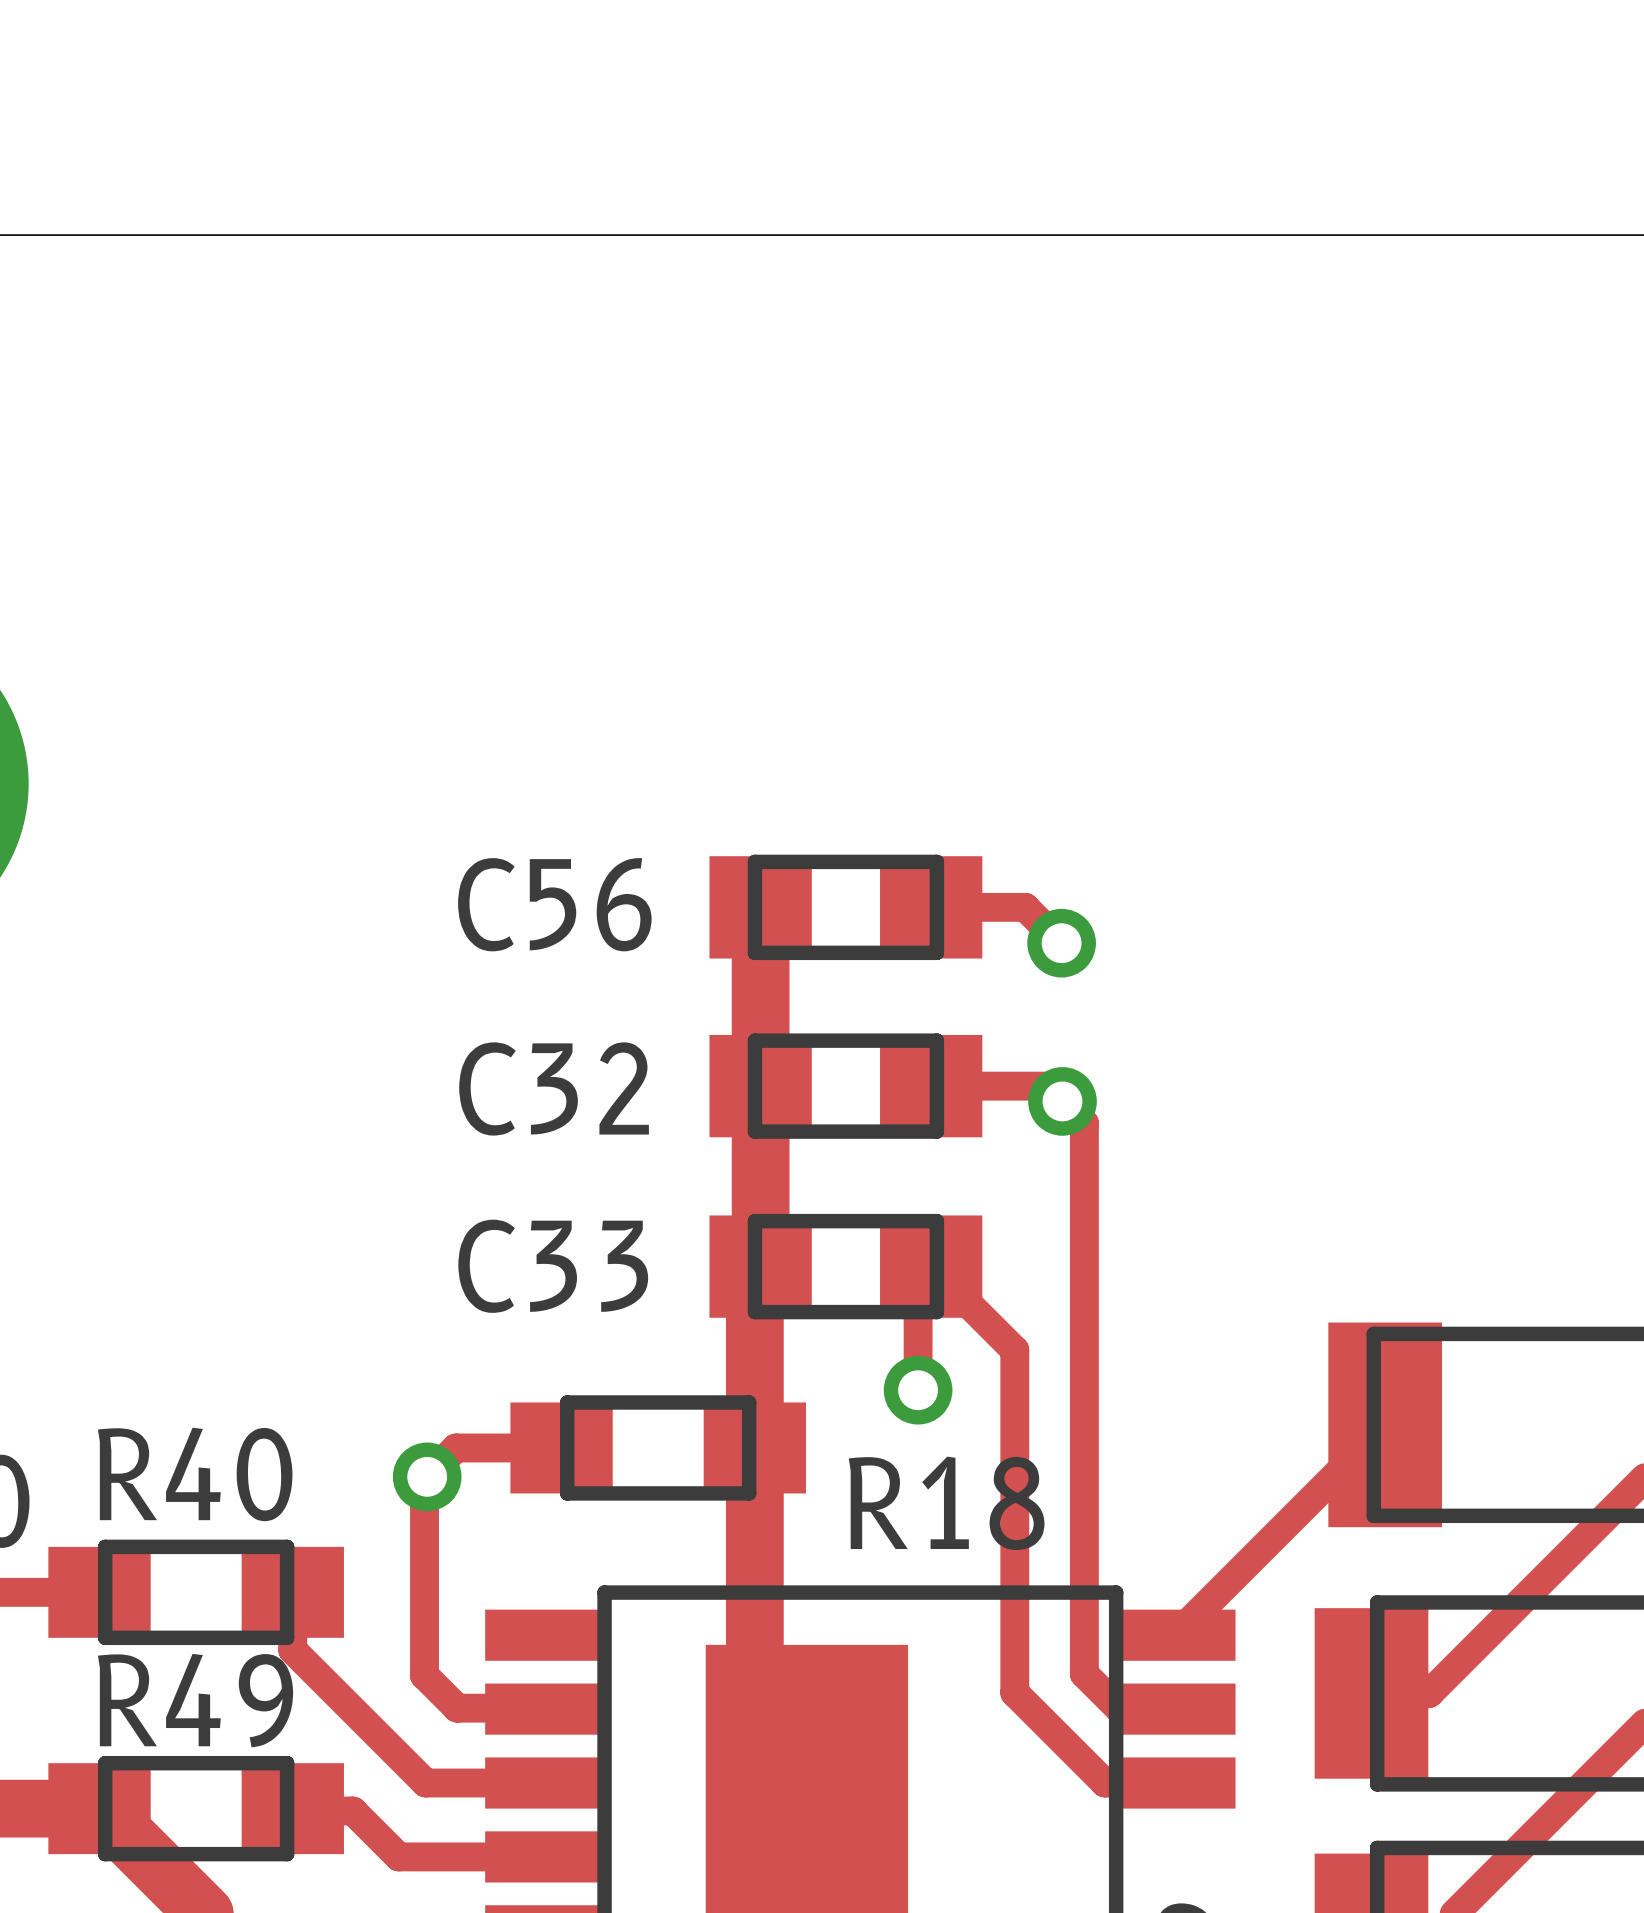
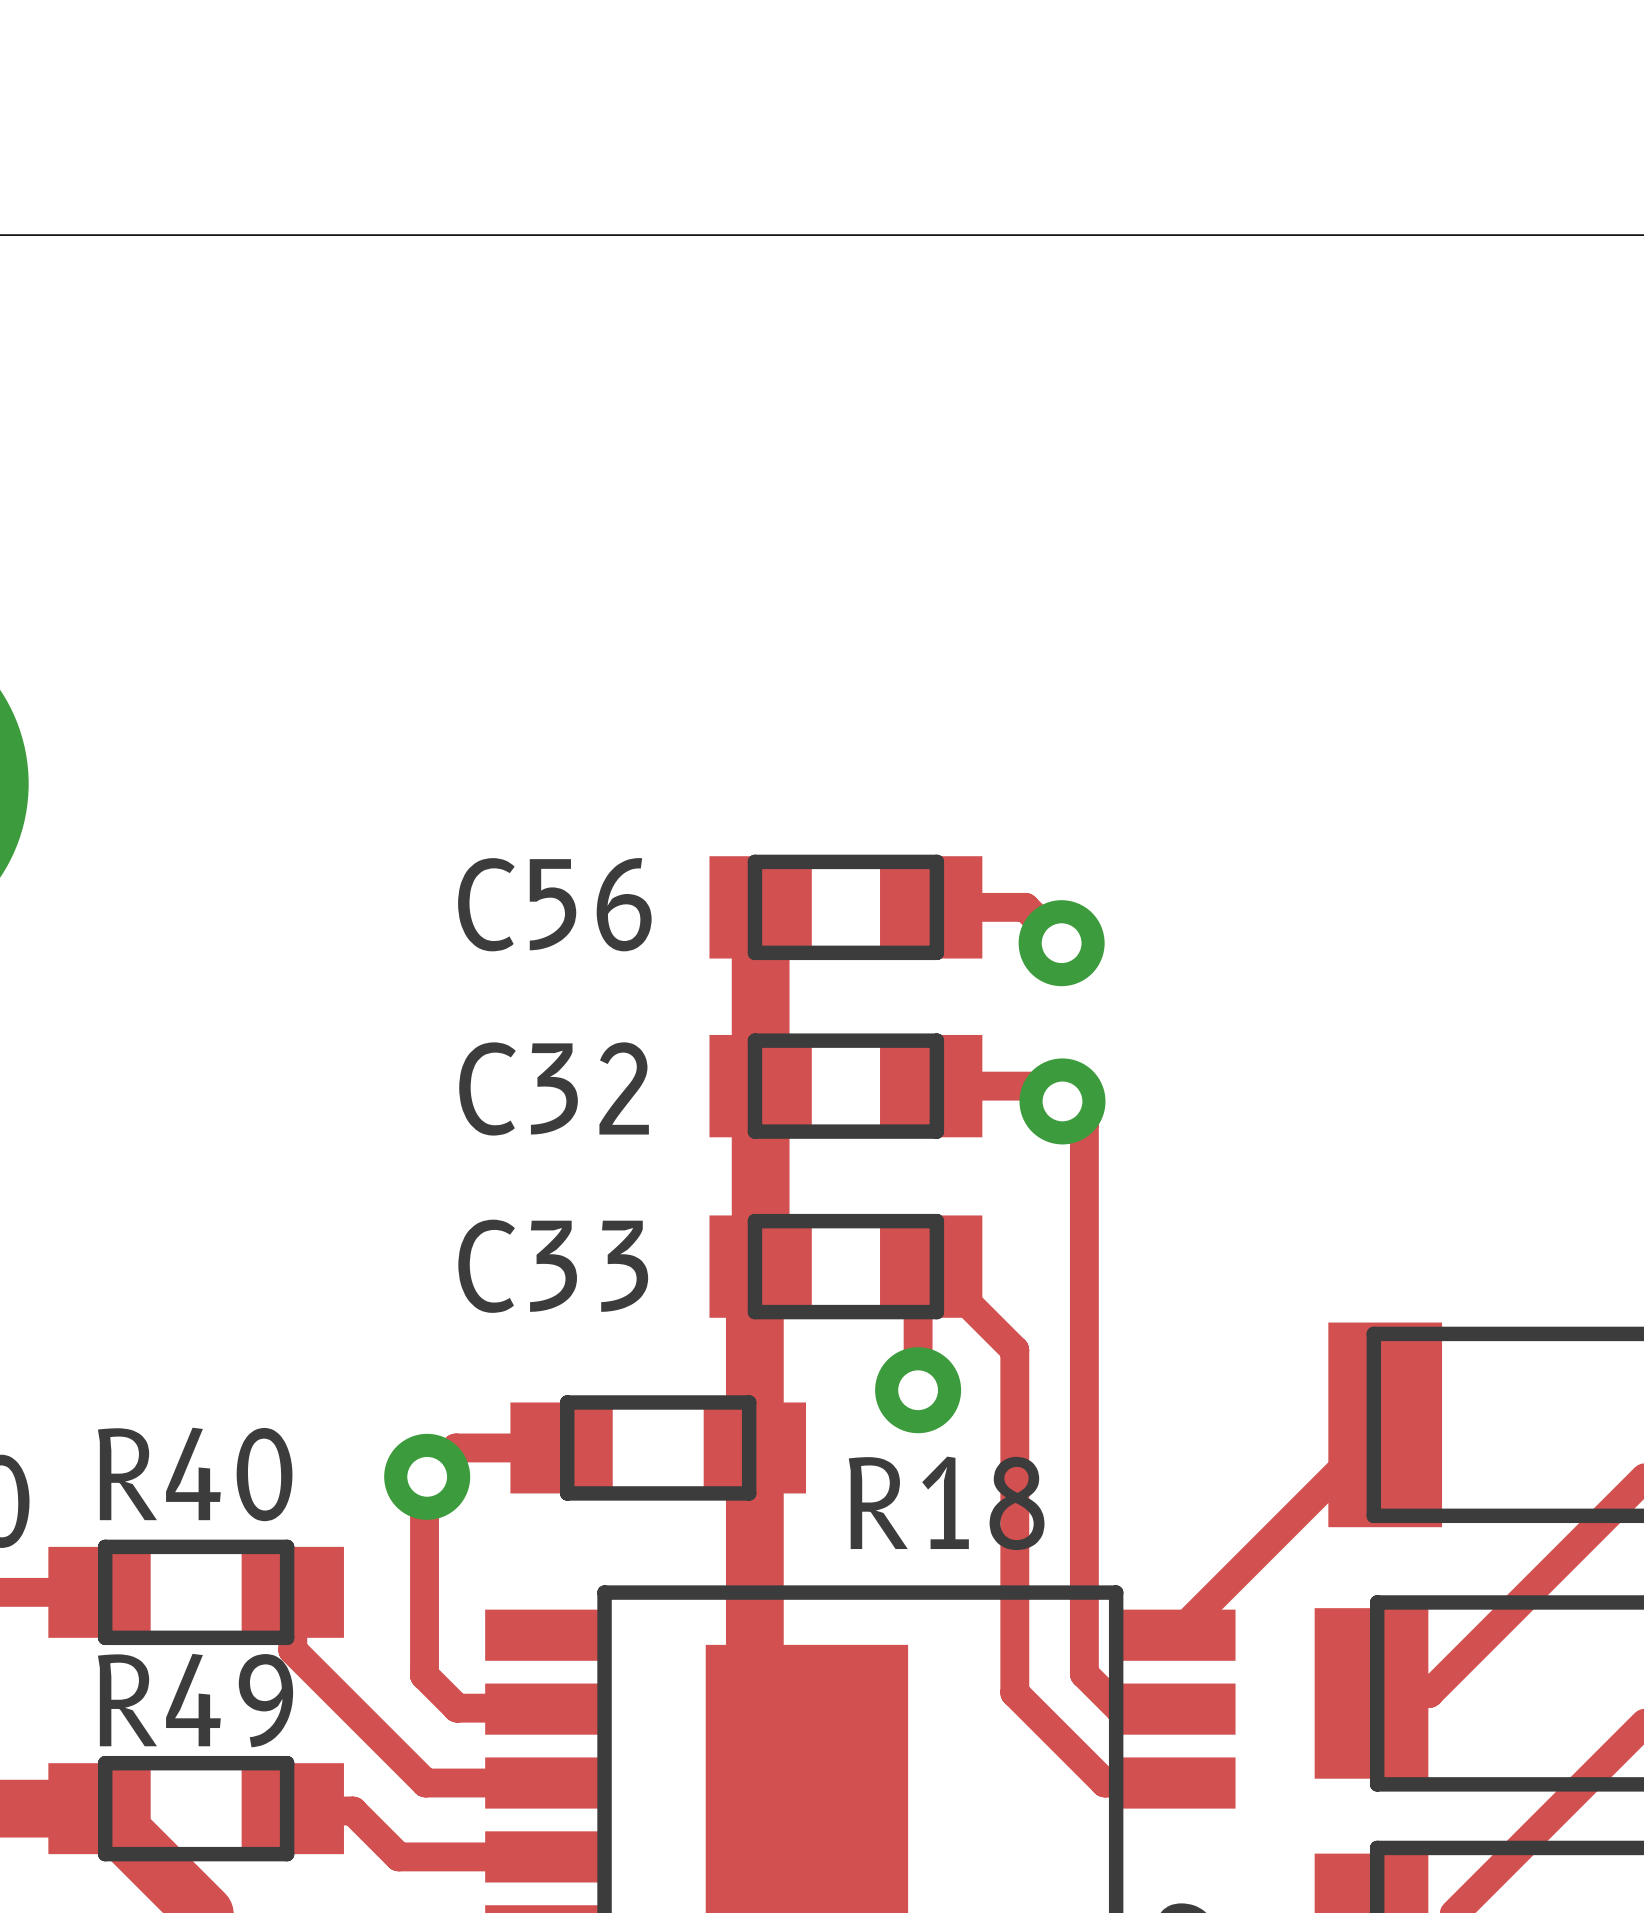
via size: [1027, 908, 1096, 978] -> [1018, 900, 1105, 987]
via size: [1028, 1067, 1097, 1136] -> [1019, 1058, 1106, 1145]
via size: [883, 1355, 953, 1425] -> [875, 1347, 962, 1434]
via size: [392, 1442, 462, 1512] -> [384, 1433, 471, 1520]

